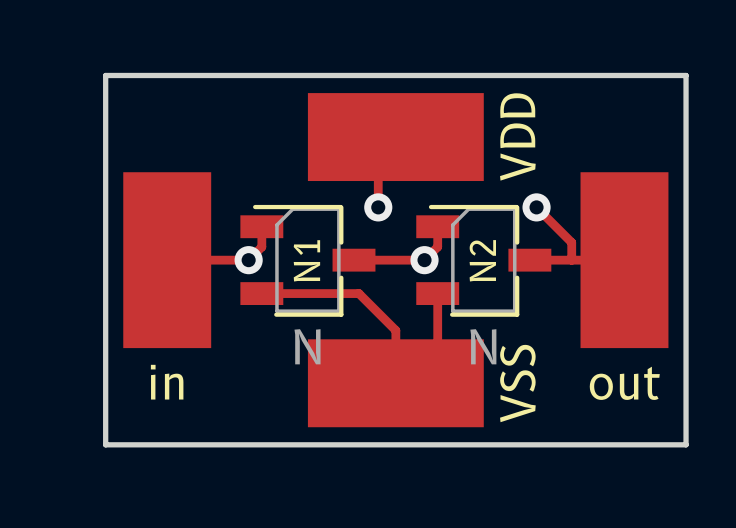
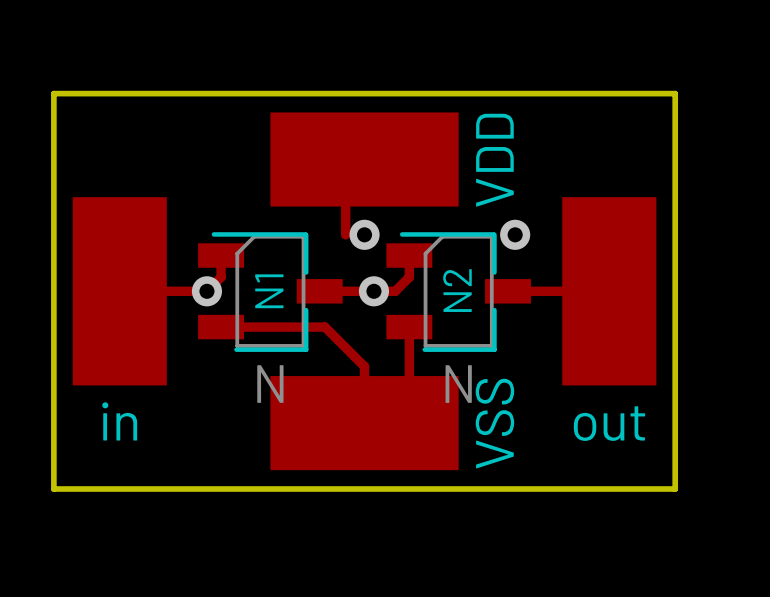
via position: (378, 207) -> (364, 234)
track: (536, 207) (571, 242) (571, 260) -> none
via position: (424, 260) -> (373, 291)

